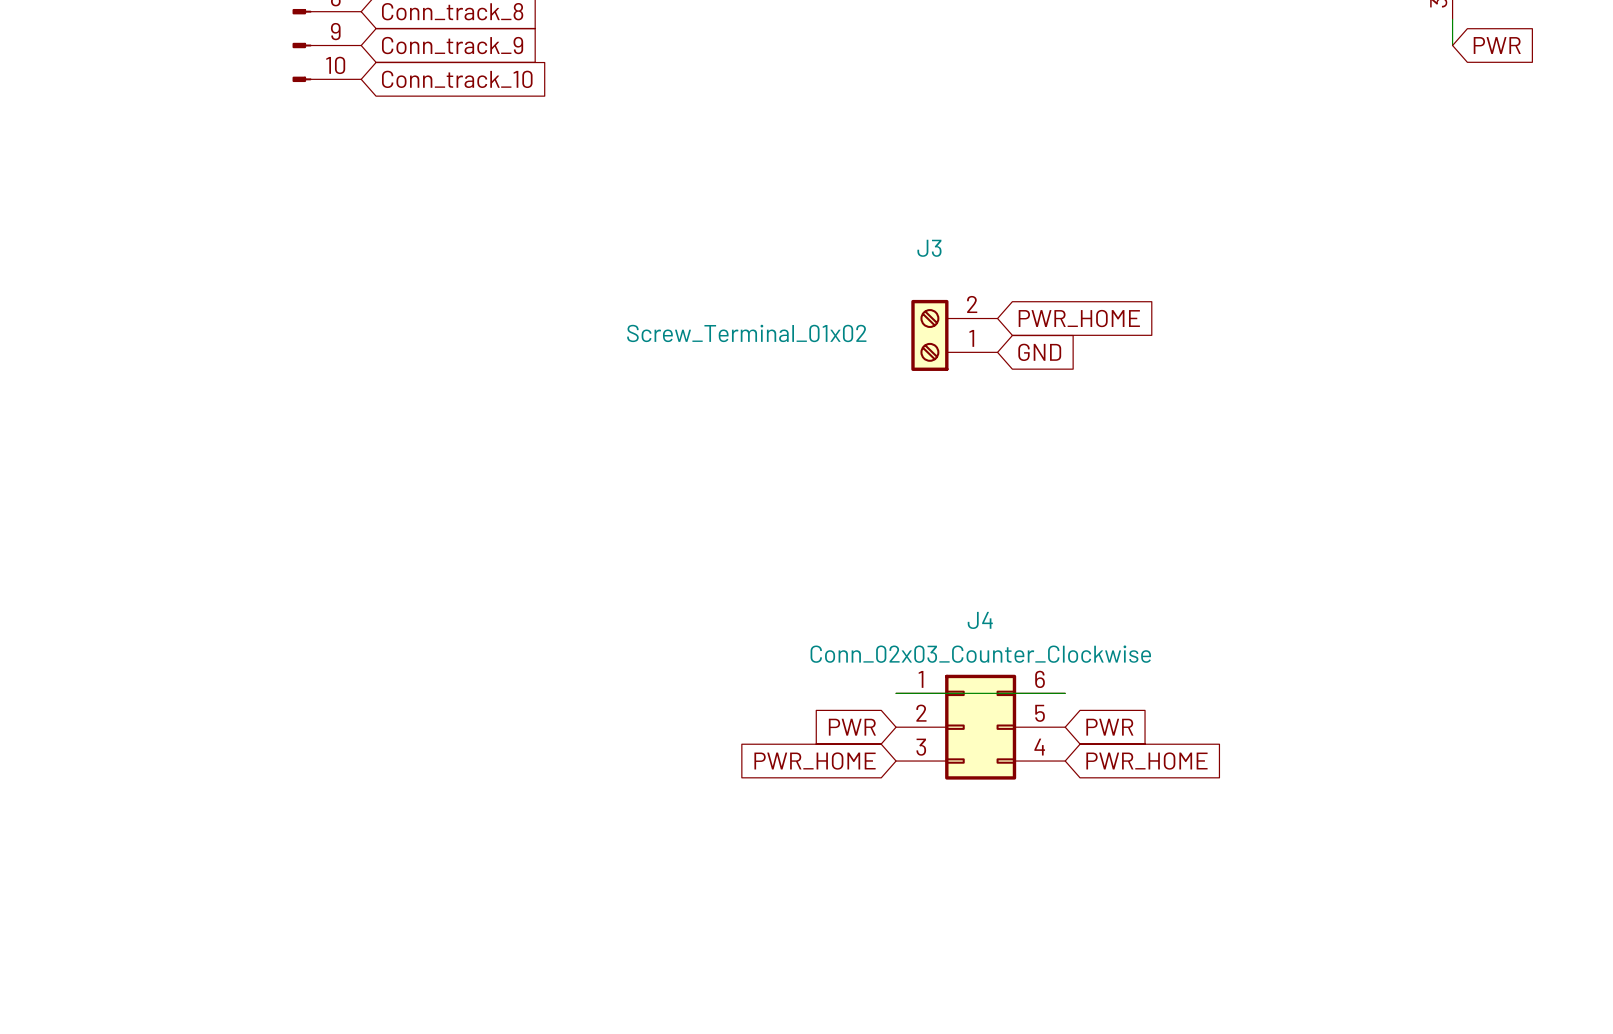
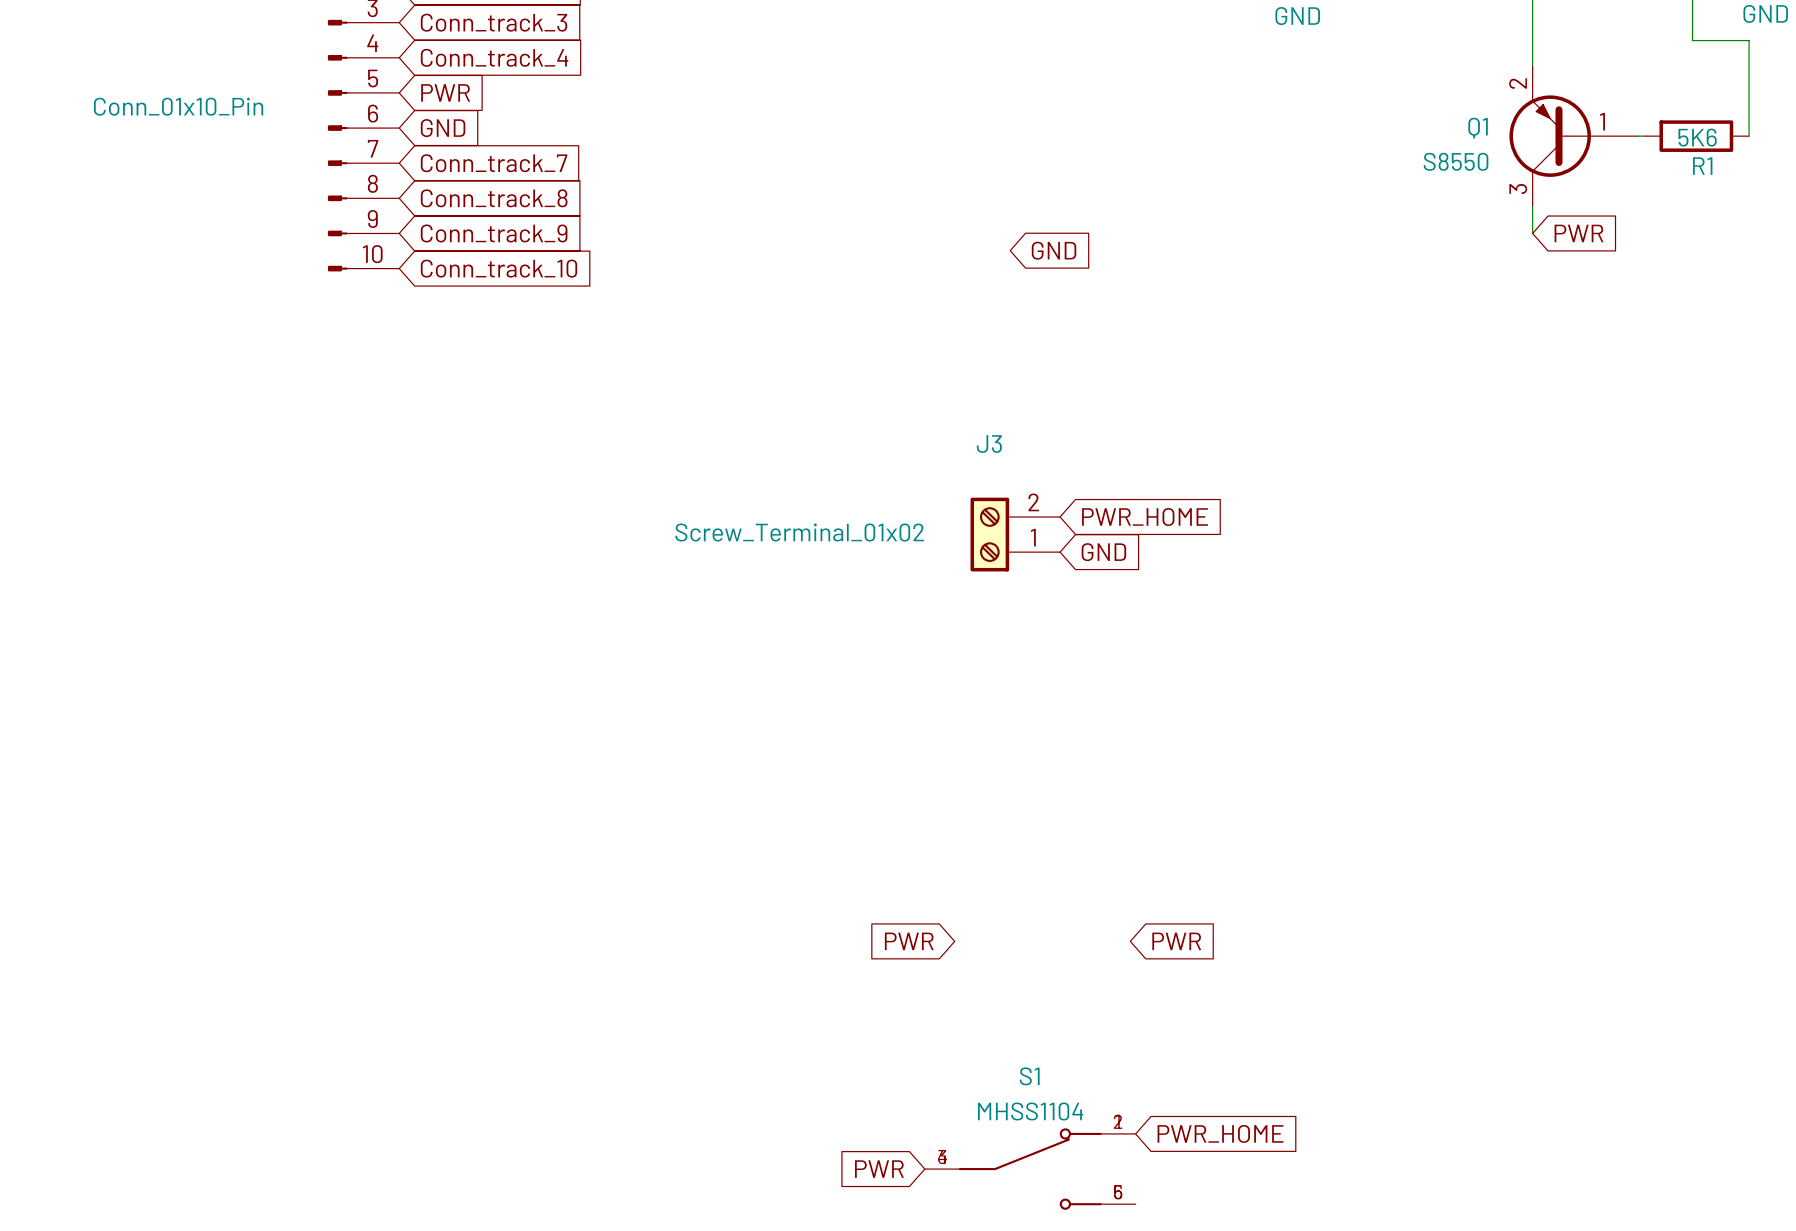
global label: none -> GND (1054, 250)
wire: (896, 693) (1065, 693) -> none
J4: Conn_02x03_Counter_Clockwise (980, 727) -> none
global label: PWR_HOME (815, 761) -> none
global label: PWR_HOME (1146, 761) -> none
global label: none -> PWR_HOME (1220, 1133)
global label: none -> PWR (879, 1169)
S1: none -> MHSS1104 (1030, 1169)

